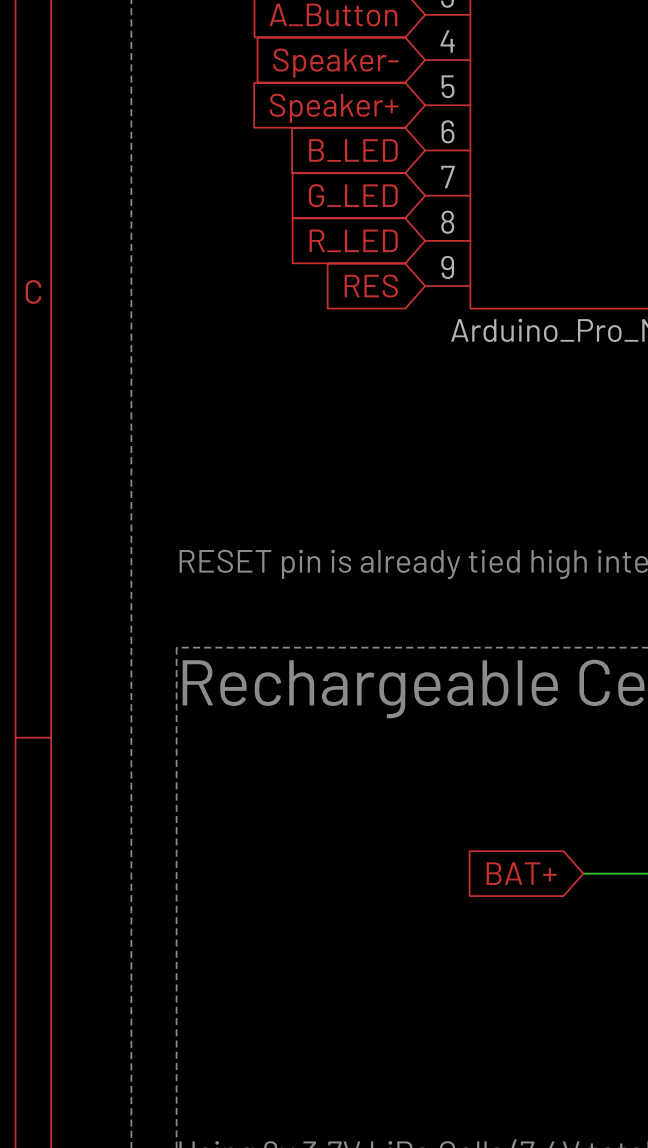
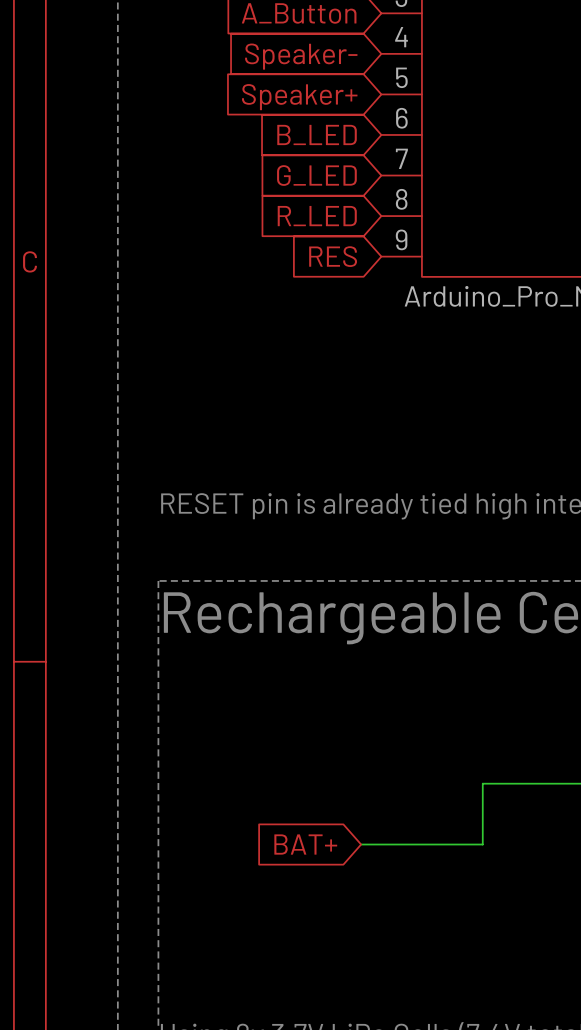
global label position: BAT+ (521, 873) -> BAT+ (305, 844)
wire: none -> (523, 783) (482, 783) (482, 844) (361, 844)

